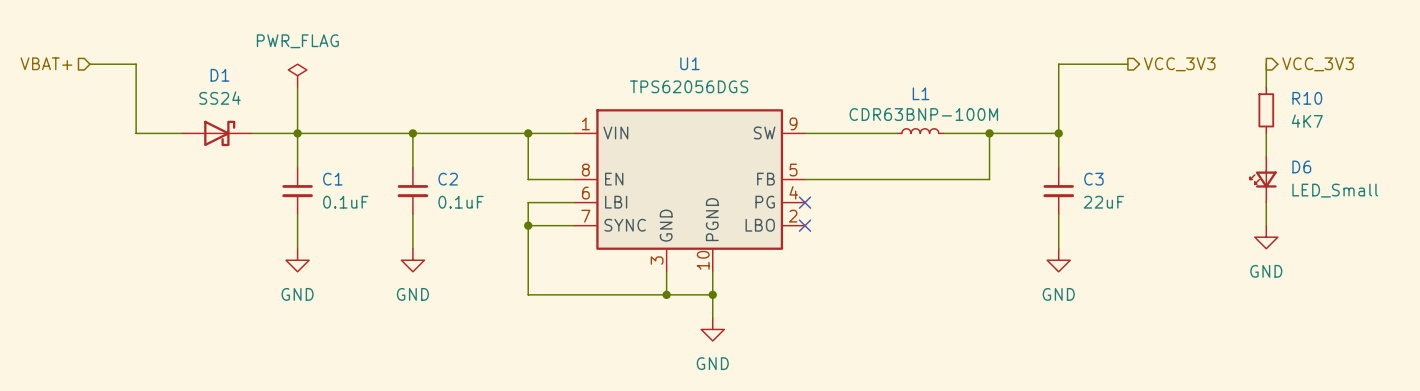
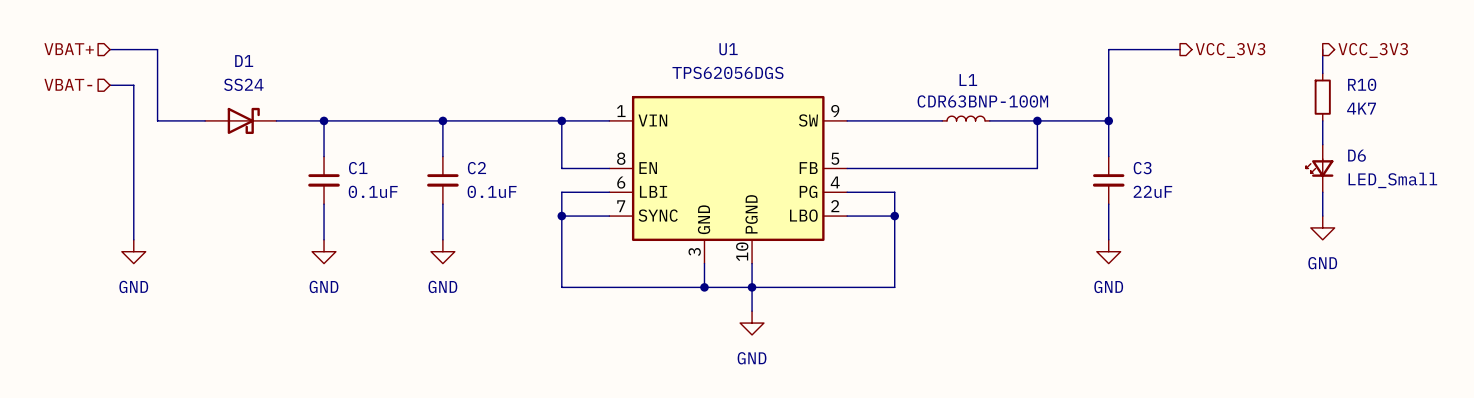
power symbol: PWR_FLAG (297, 75) -> none
wire: (297, 87) (297, 133) -> none
hierarchical label: none -> VBAT- (68, 84)
wire: none -> (110, 85) (133, 85) (133, 239)
wire: none -> (847, 192) (894, 192) (894, 287) (752, 287)
no-connect mark: (805, 202) -> none
wire: none -> (847, 216) (894, 216)
no-connect mark: (805, 225) -> none
junction: none -> (894, 216)
power symbol: none -> GND (133, 251)

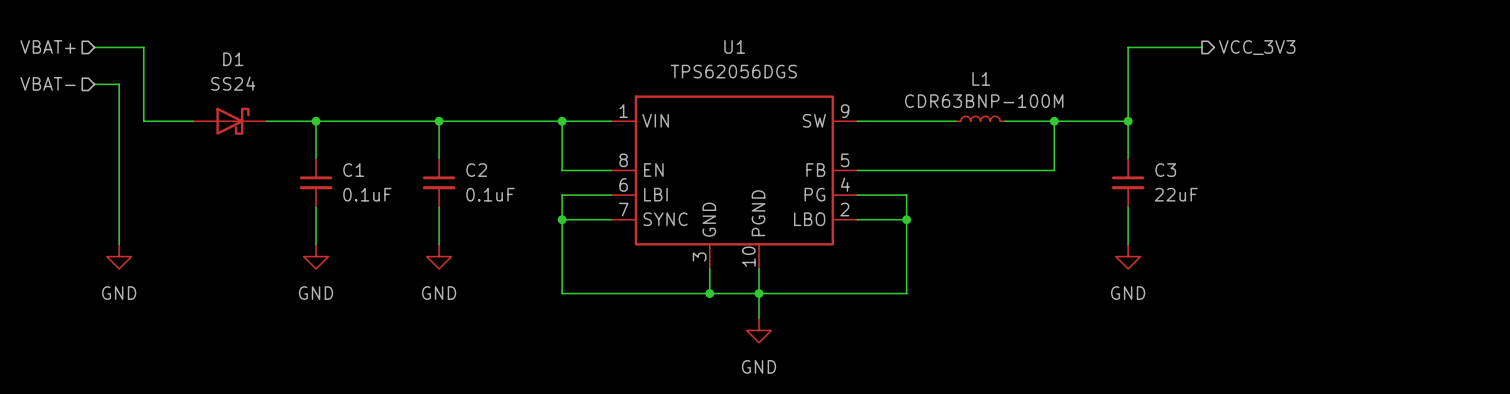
wire: (1322, 49) (1322, 73) -> none
hierarchical label: VCC_3V3 (1373, 50) -> none
R10: 4K7 (1322, 97) -> none
wire: (1322, 120) (1322, 144) -> none
D6: LED_Small (1319, 168) -> none
wire: (1322, 192) (1322, 216) -> none
power symbol: GND (1322, 227) -> none

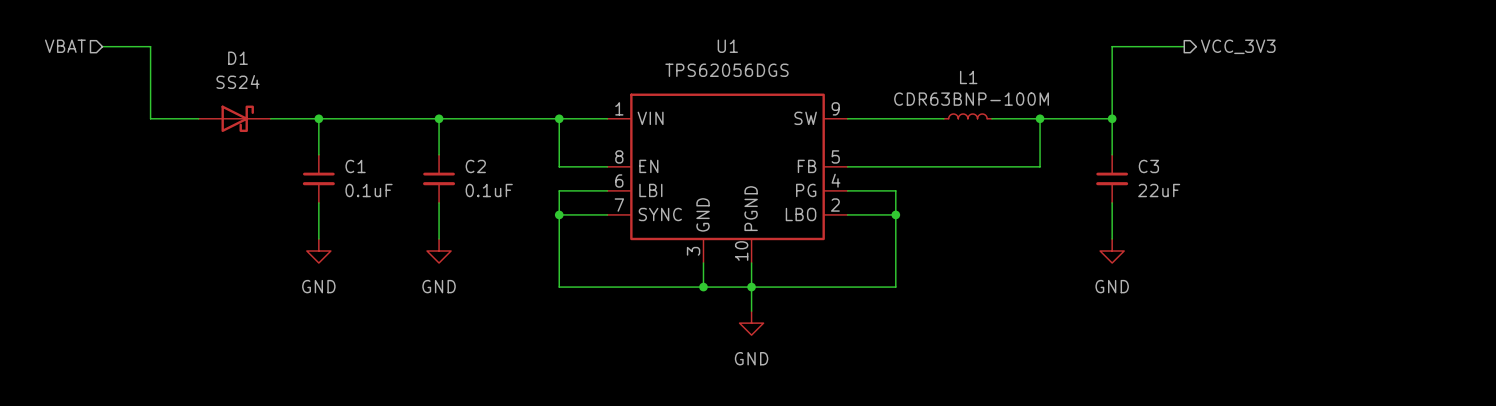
hierarchical label: VBAT+ (48, 46) -> VBAT (65, 46)
hierarchical label: VBAT- (48, 83) -> none
wire: (94, 84) (119, 84) (119, 244) -> none
power symbol: GND (119, 256) -> none

